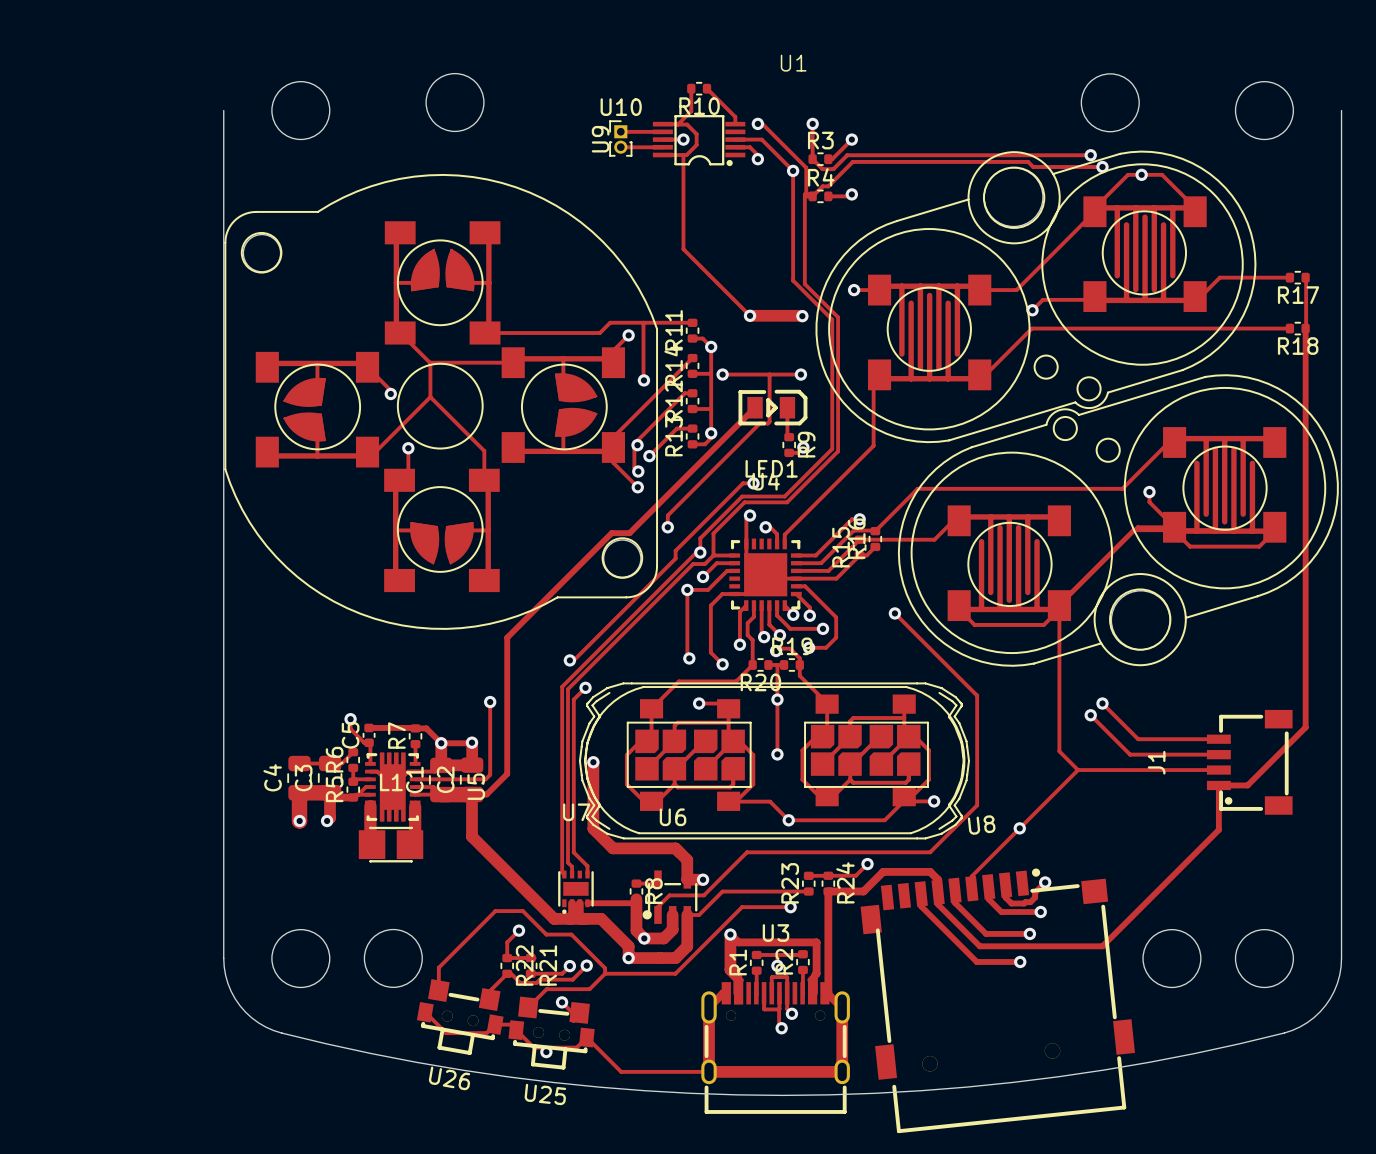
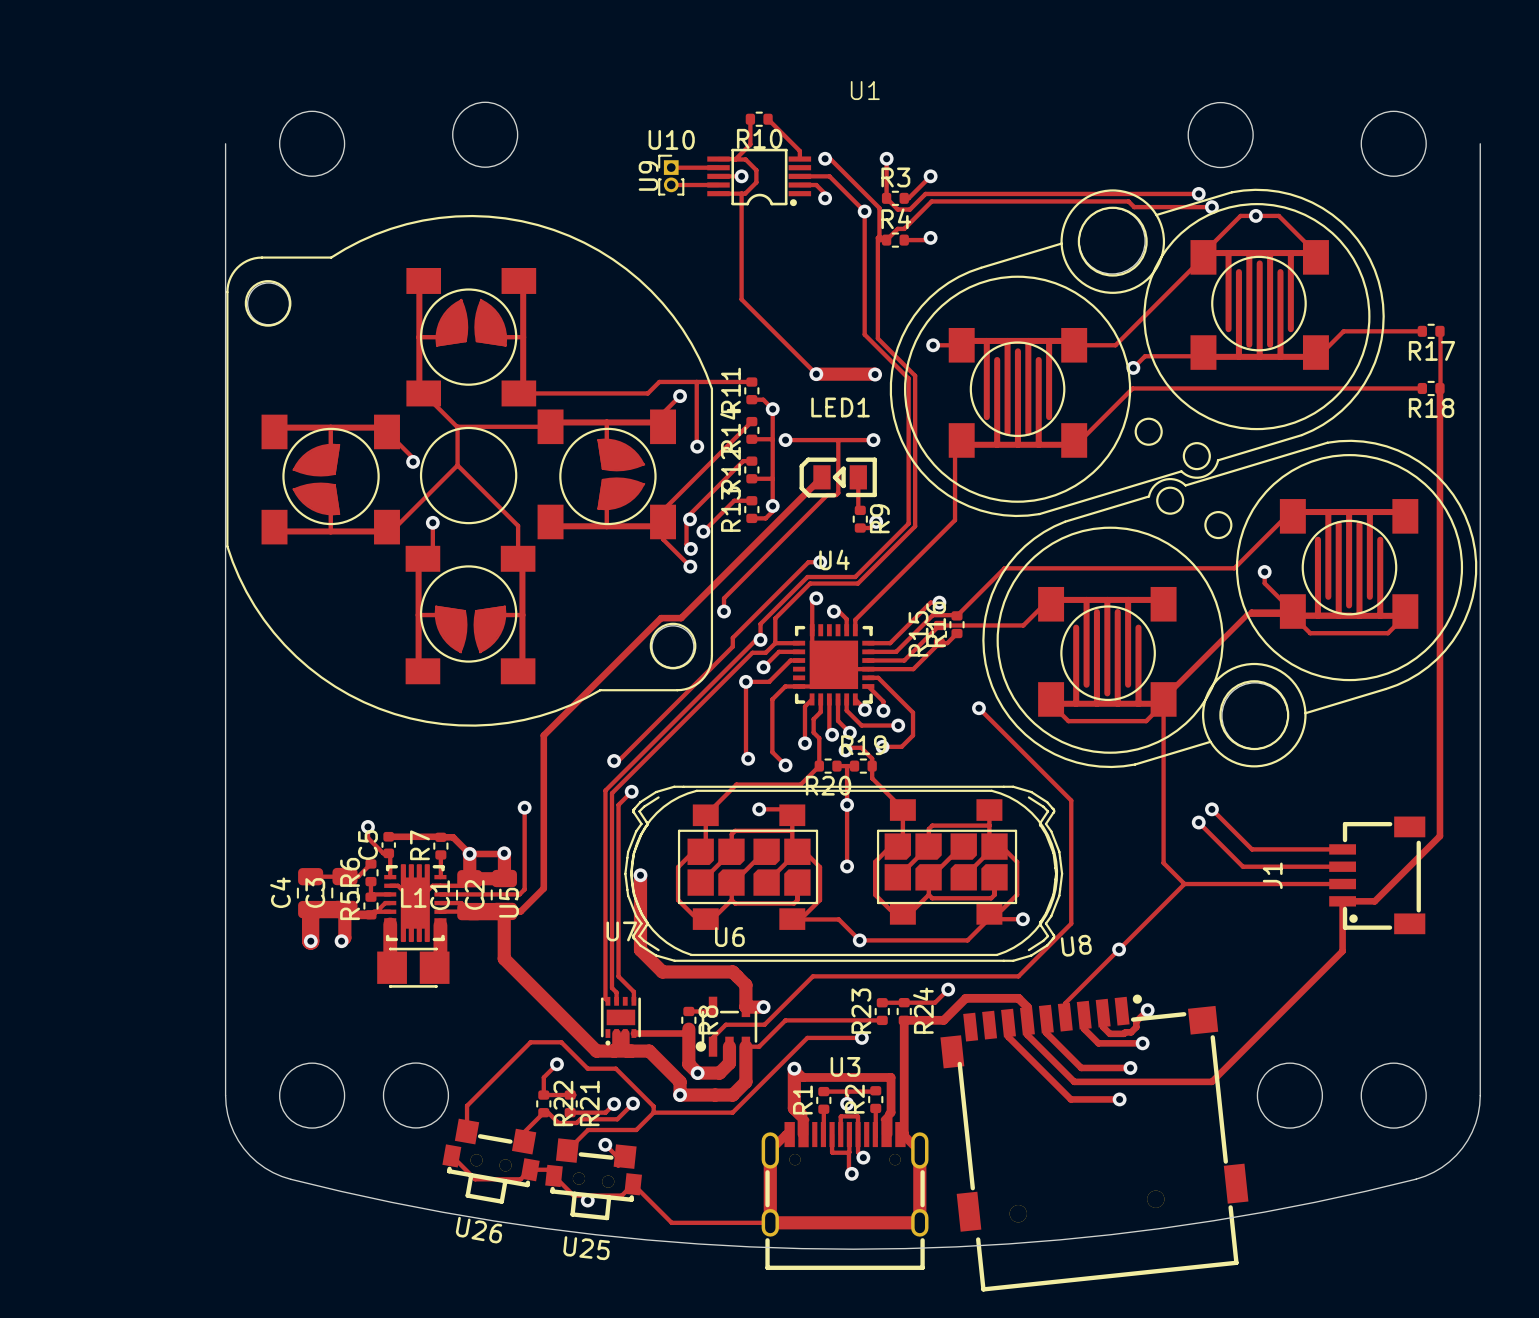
LED1 rotation: 0° (772, 407) -> 180° (838, 477)

